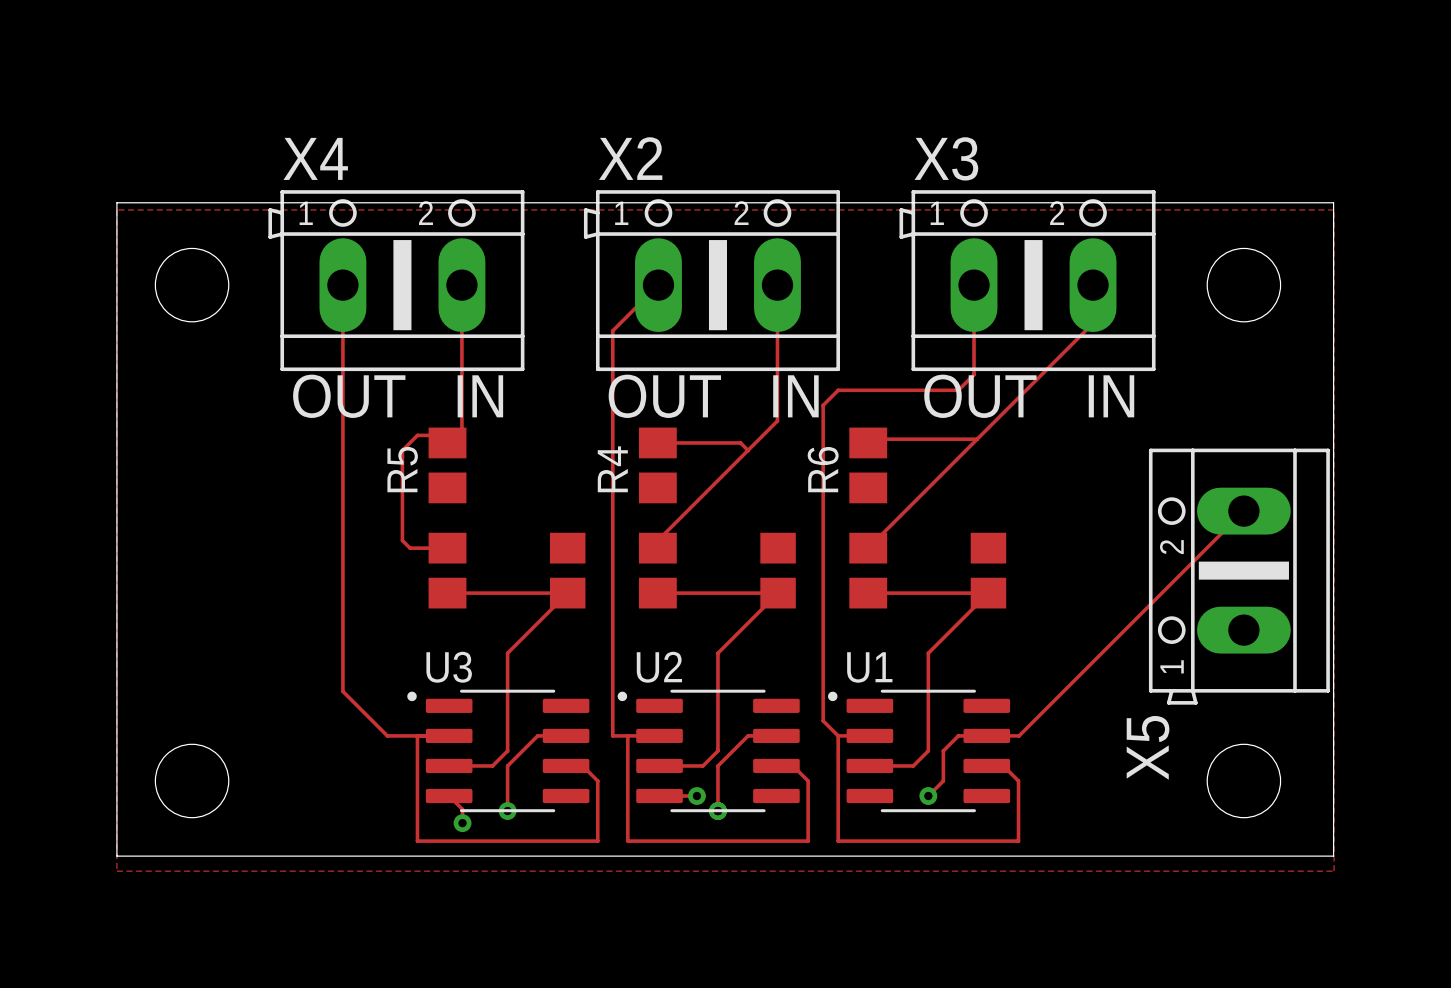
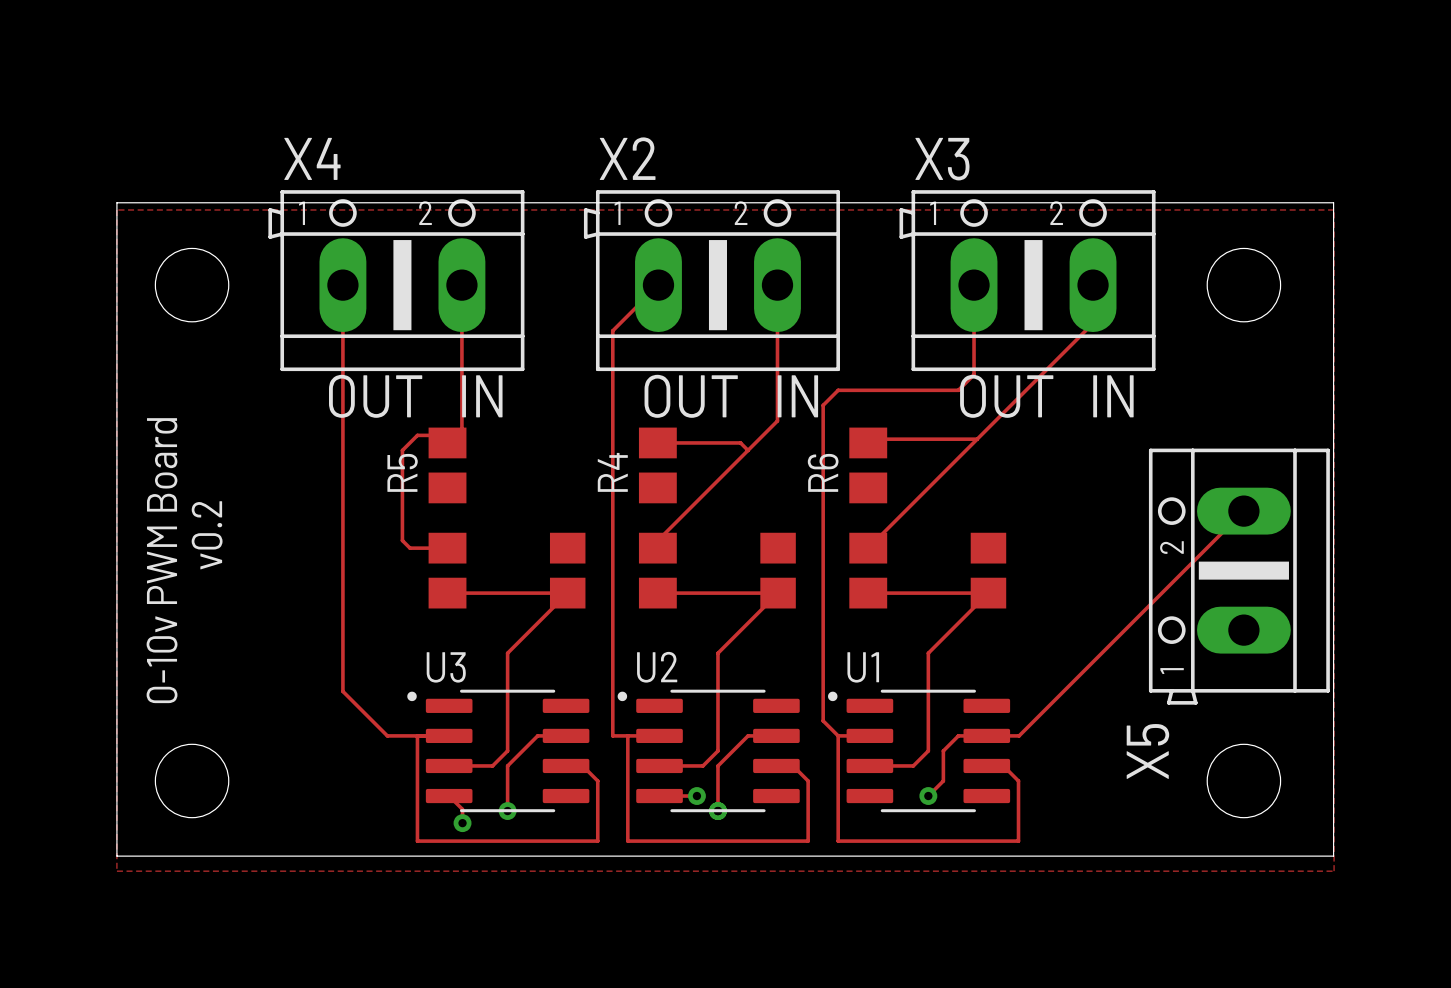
text: none -> v0.2 (207, 535)
text: none -> 0-10v PWM Board (162, 560)

